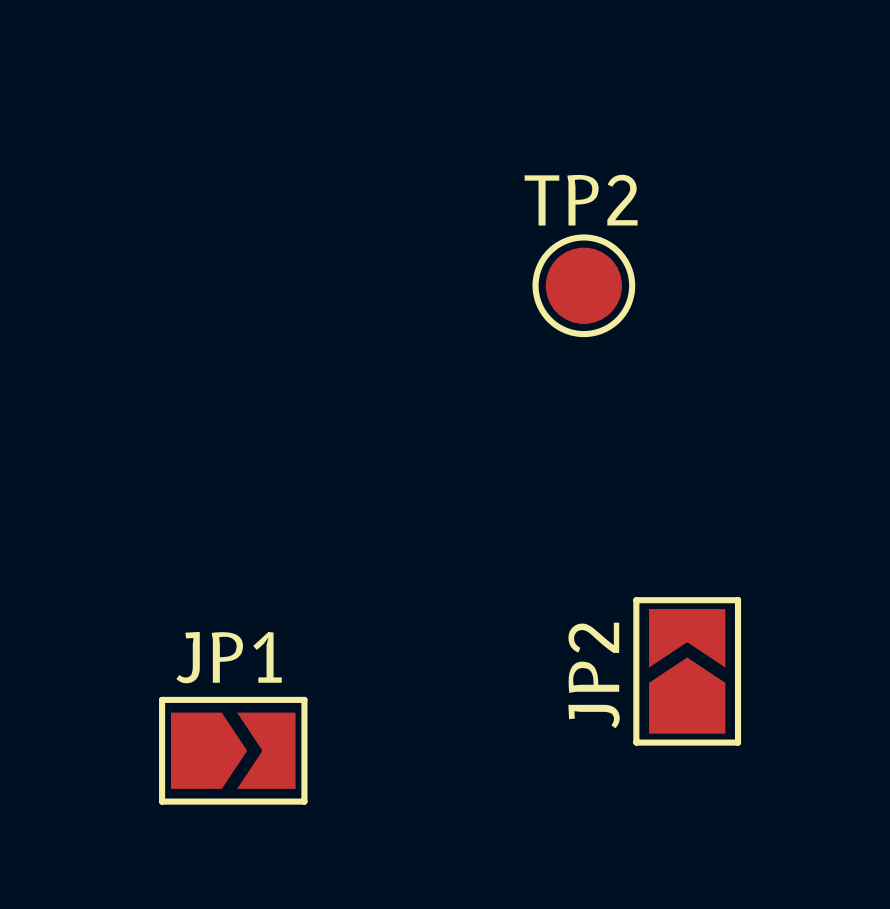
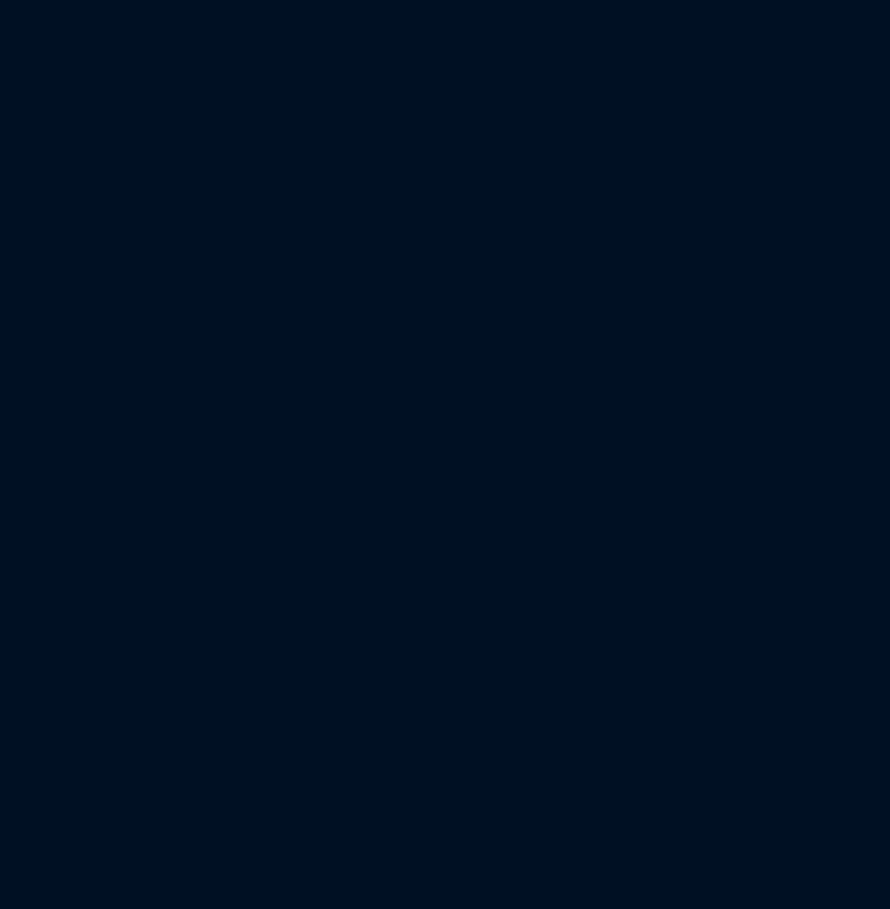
TP2: (583, 285) -> none
JP2: (687, 671) -> none
JP1: (233, 750) -> none

